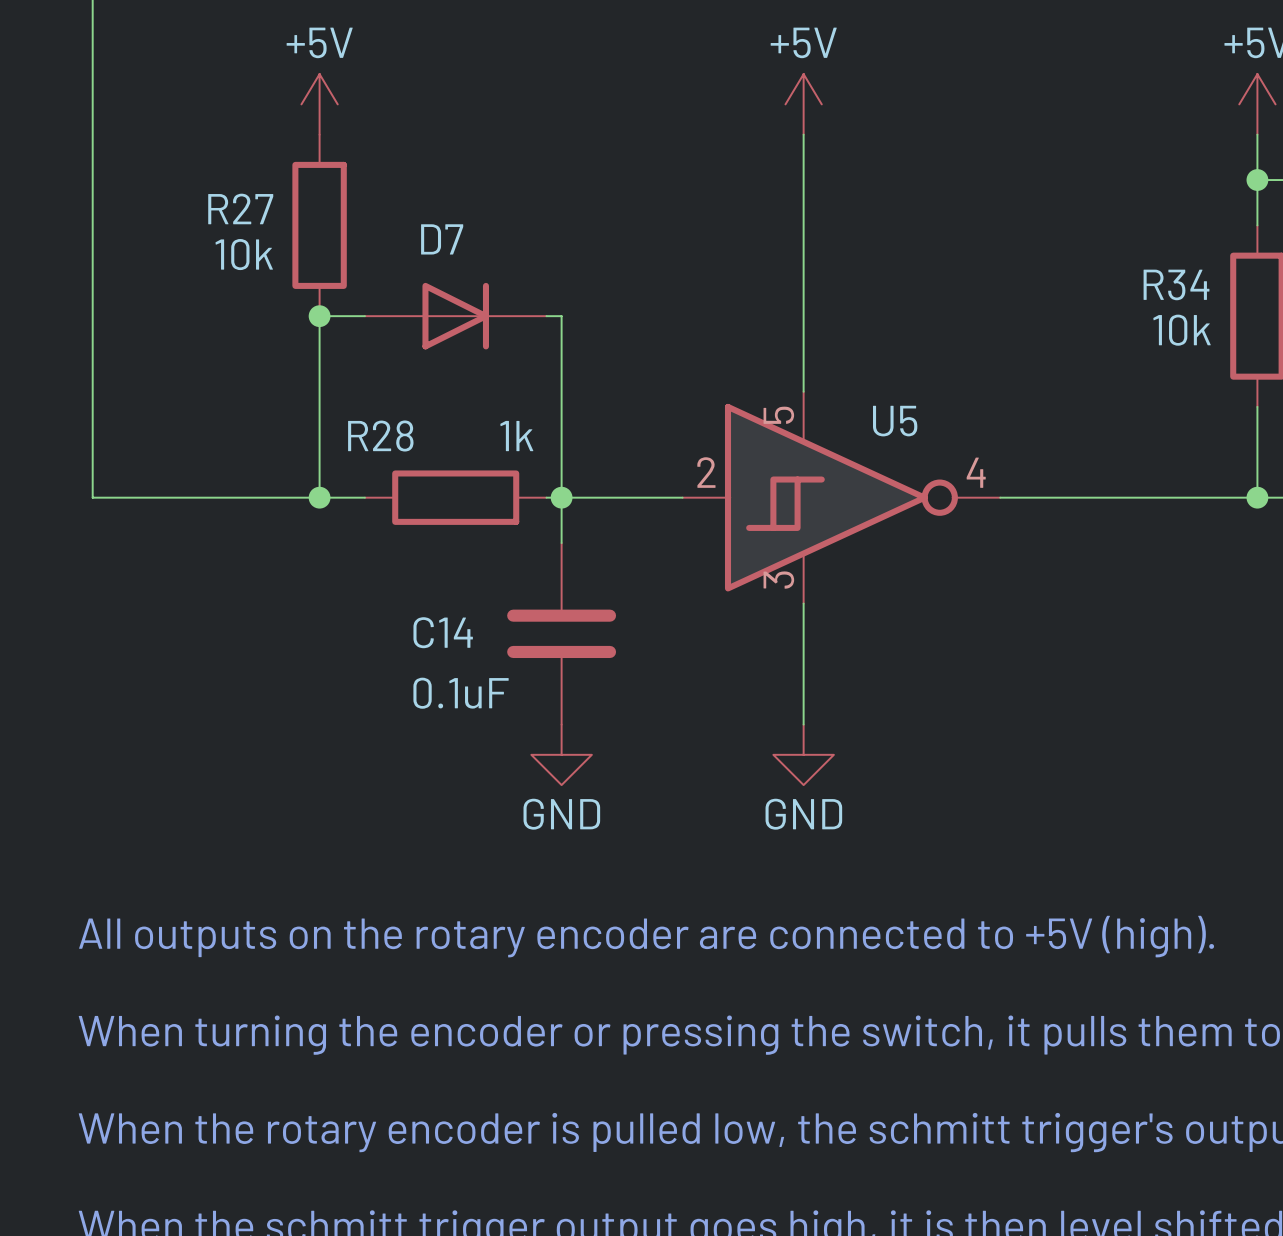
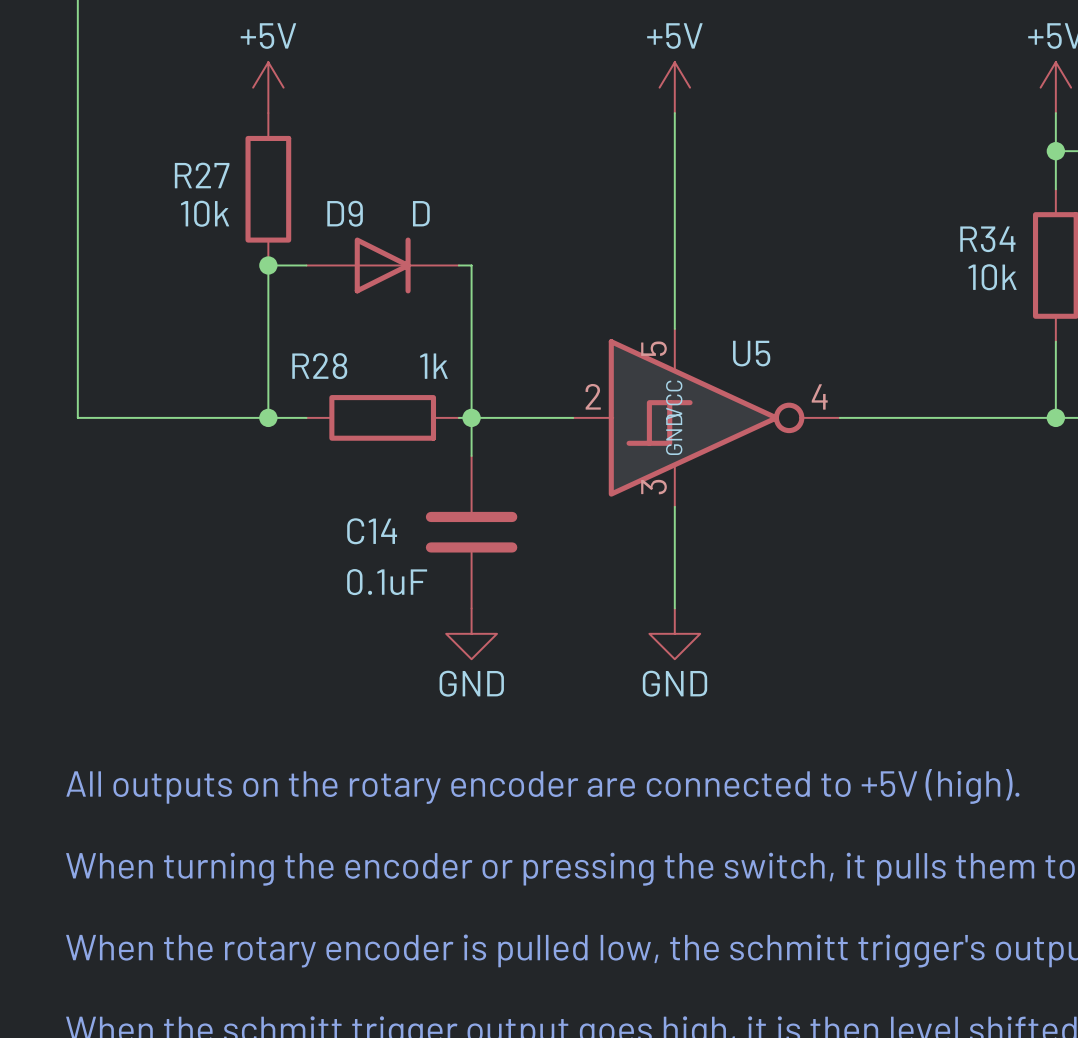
D7 name: D7 (442, 239) -> D9 (345, 213)
D7 value: none -> D (421, 213)
U5 pin name: none -> VCC (674, 400)
U5 pin name: none -> GND (674, 434)

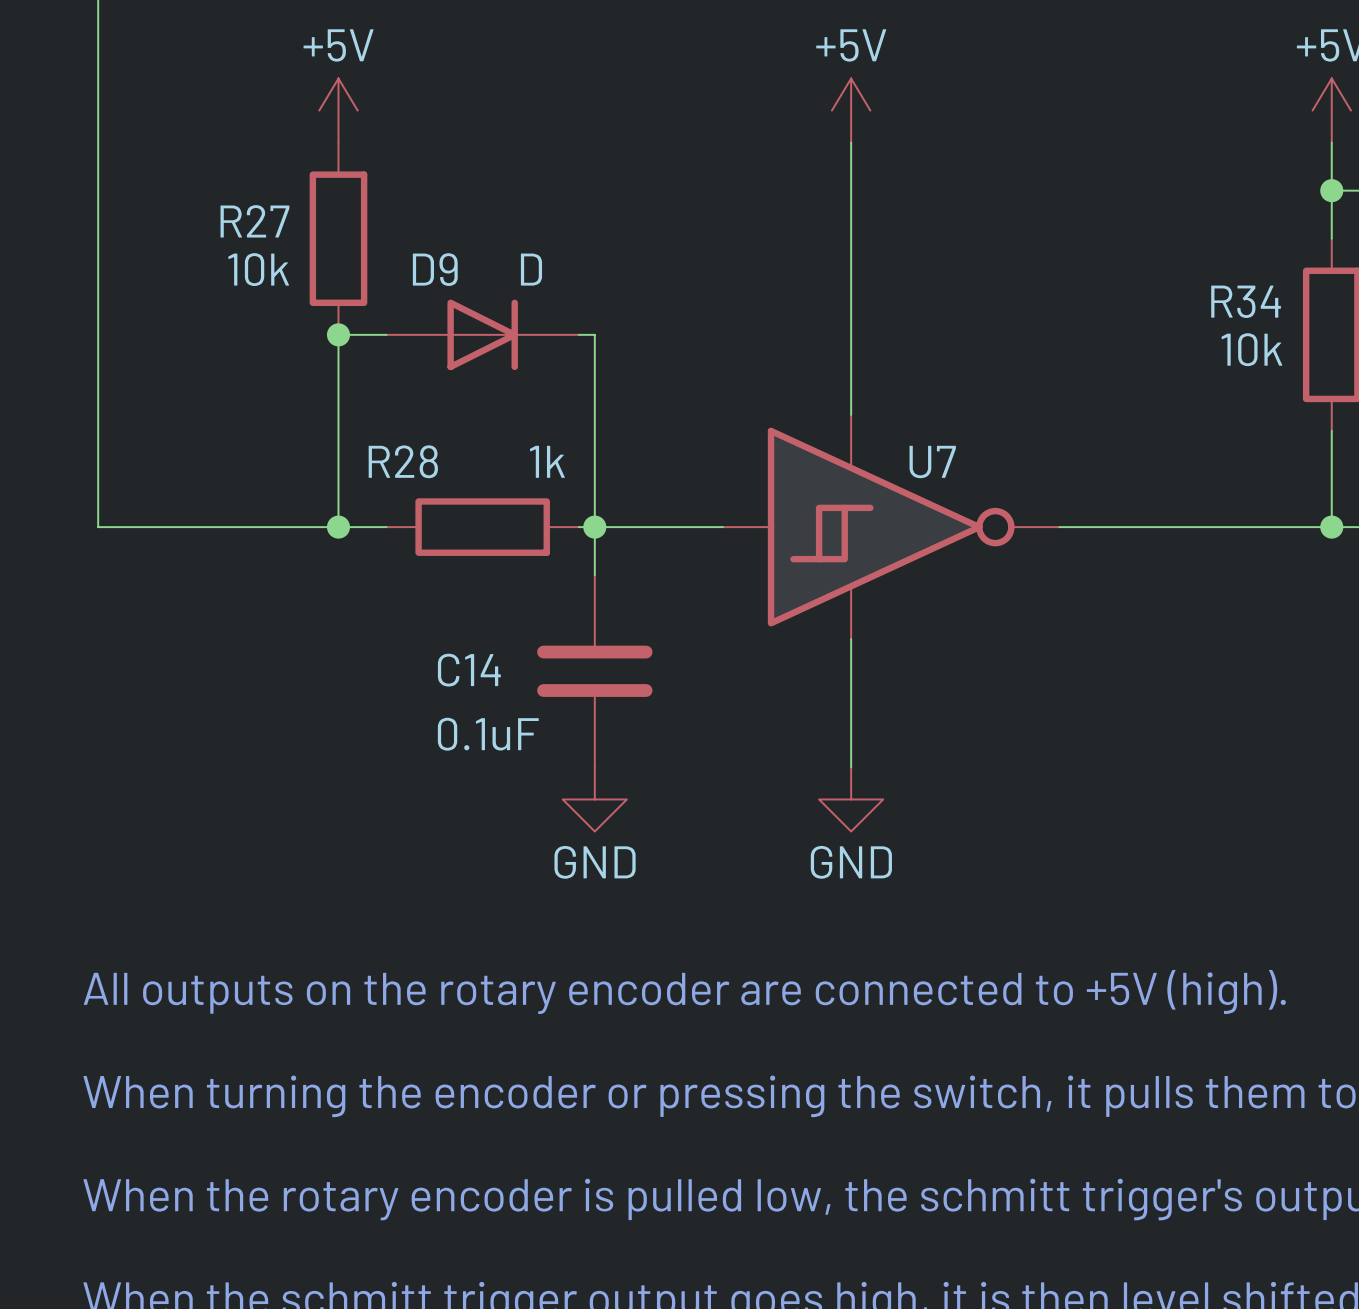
U5 pin number: 5 (653, 348) -> none
U5 name: U5 (751, 353) -> U7 (932, 462)
U5 pin number: 2 (593, 396) -> none
U5 pin number: 4 (819, 396) -> none
U5 pin name: VCC (674, 400) -> none
U5 pin name: GND (674, 434) -> none
U5 pin number: 3 (653, 487) -> none

